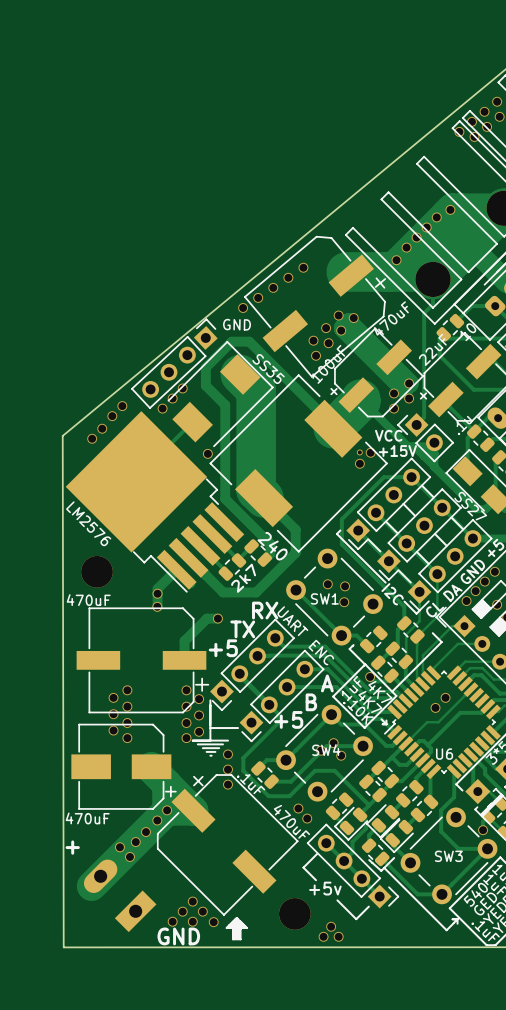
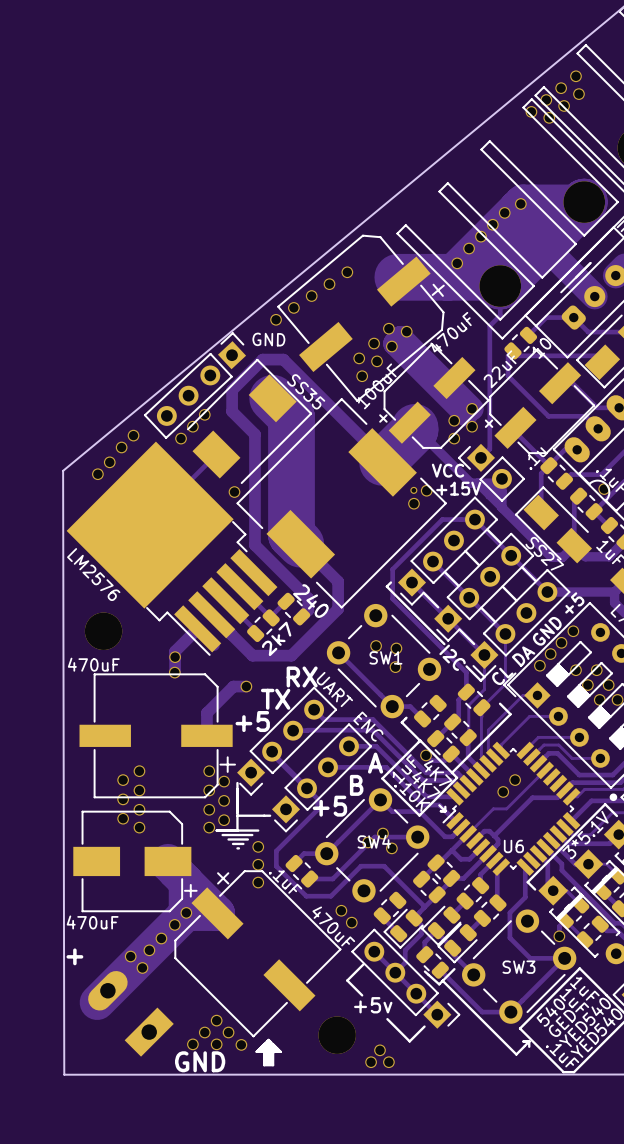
SW1 name position: SW1 (324, 598) -> SW1 (385, 657)

